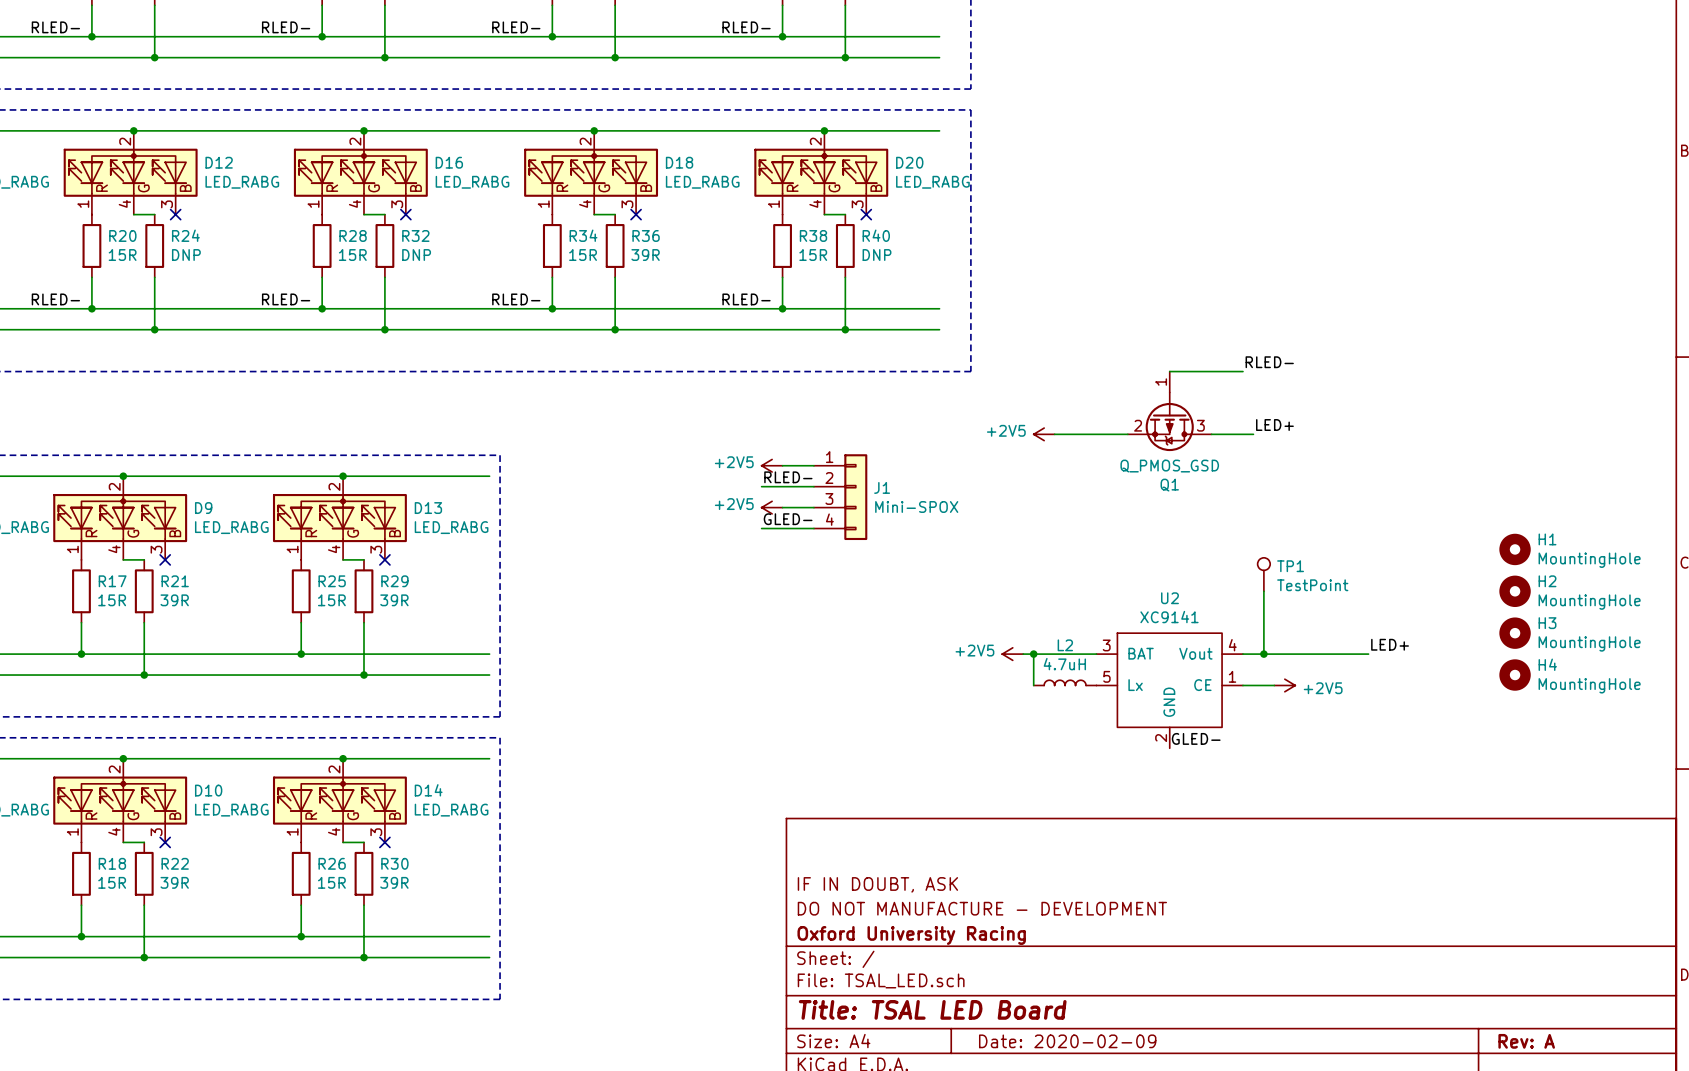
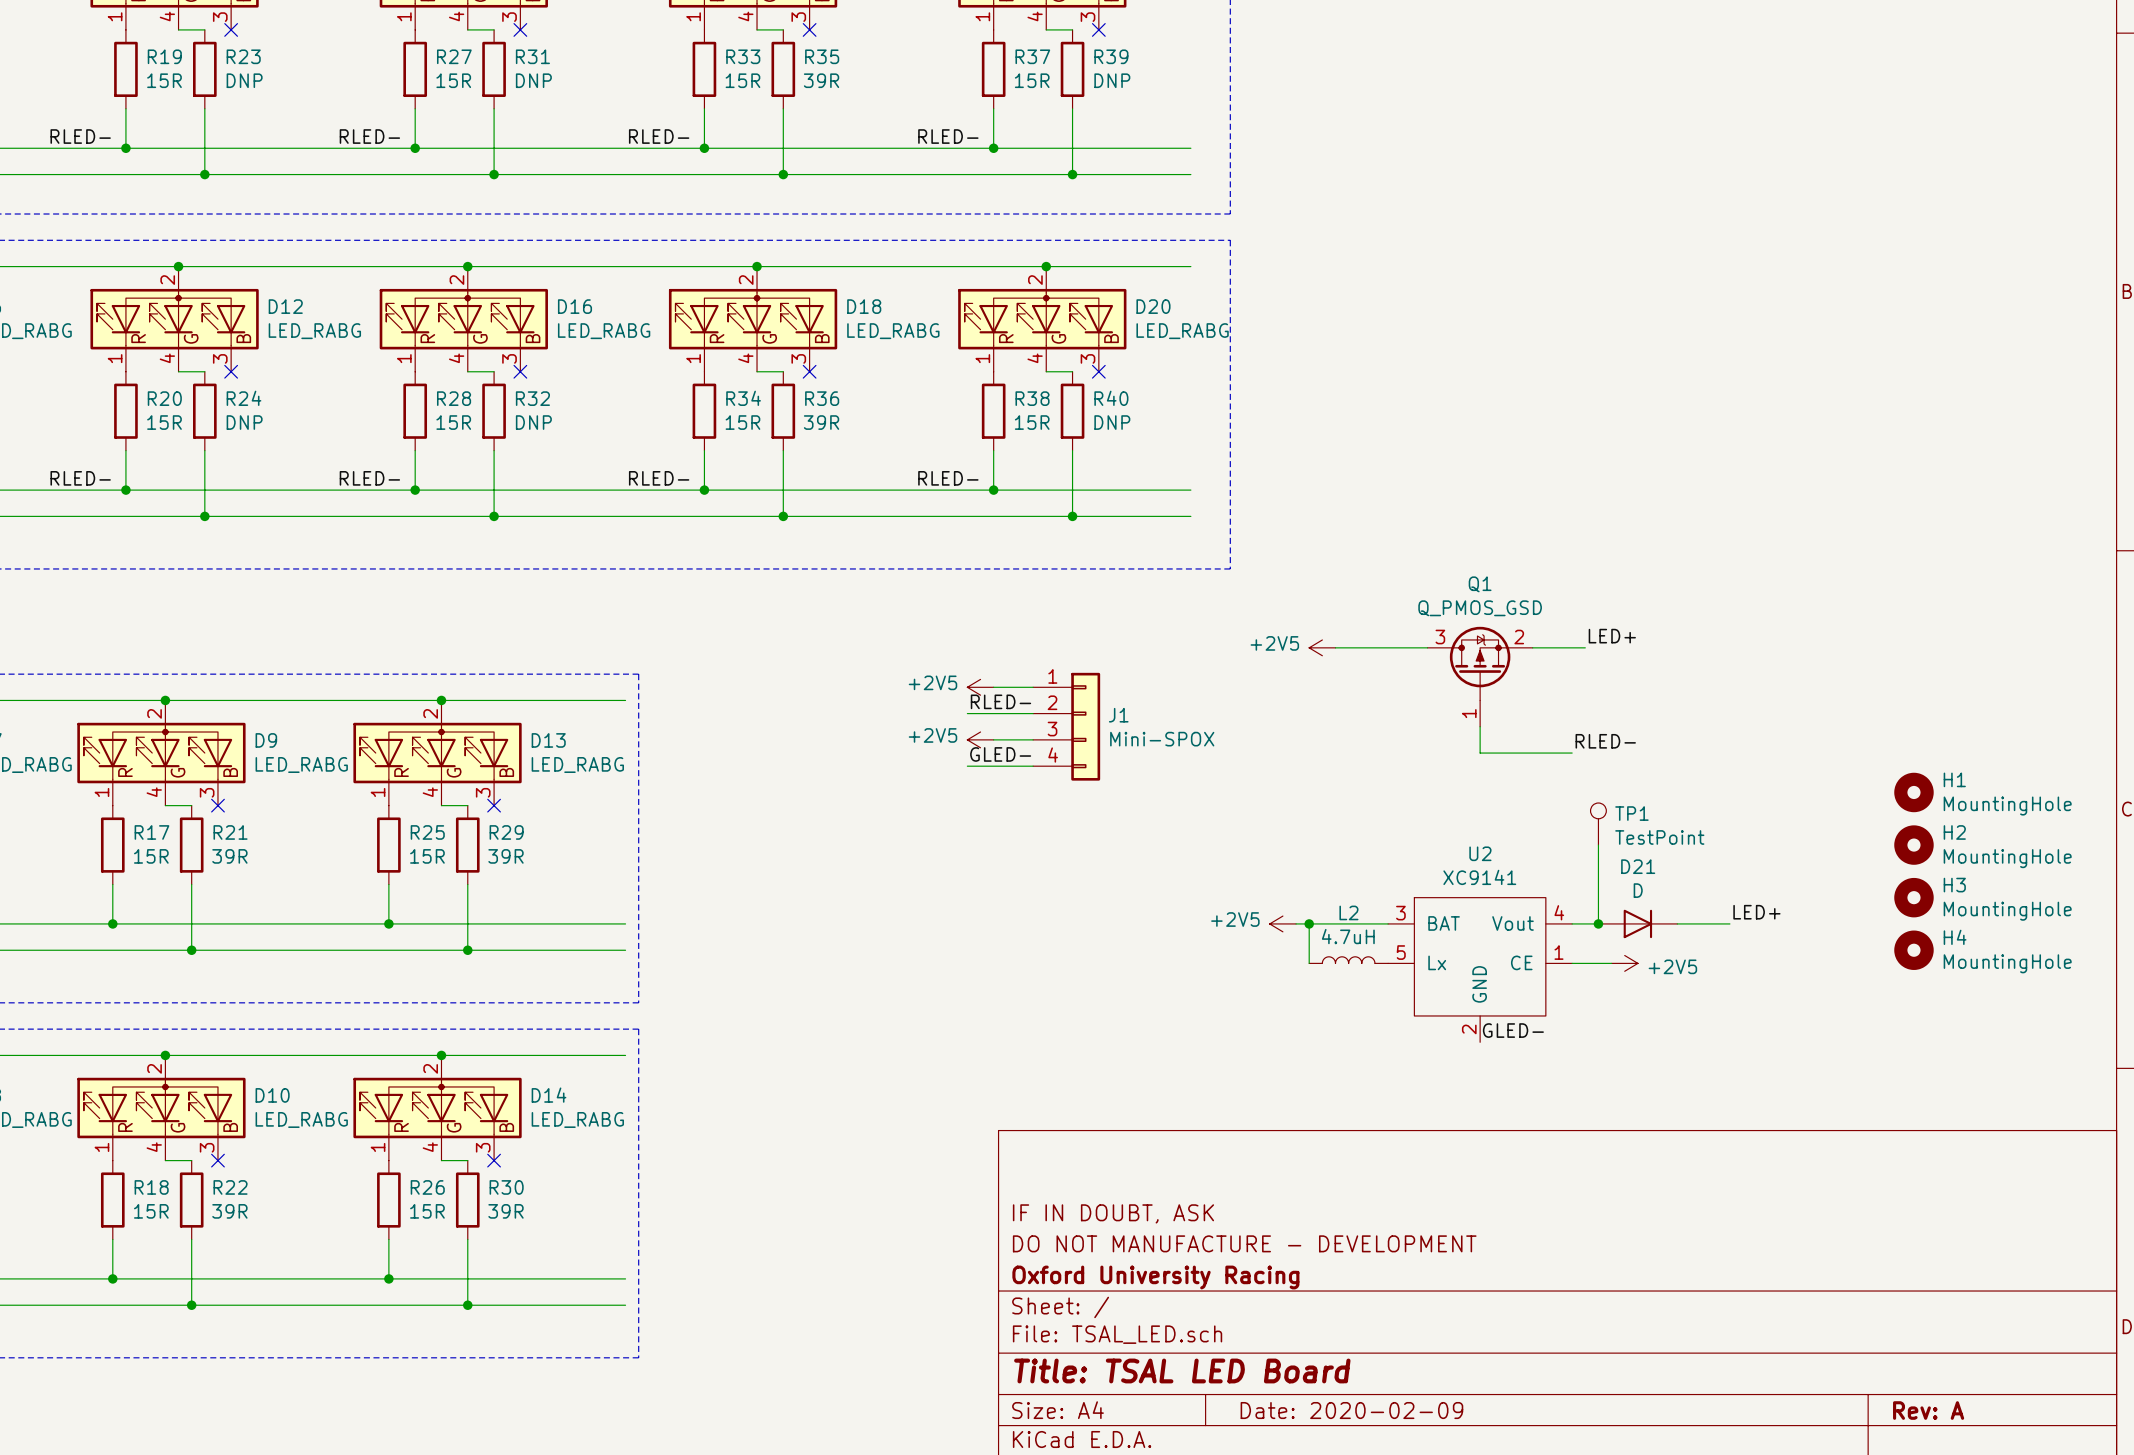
label position: RLED- (1269, 362) -> RLED- (1605, 741)
wire: (1169, 371) (1242, 371) -> none
Q1 rotation: 0° (1169, 421) -> 180° (1480, 663)
wire: none -> (1480, 726) (1480, 753) (1572, 753)
D21: none -> D (1637, 923)

